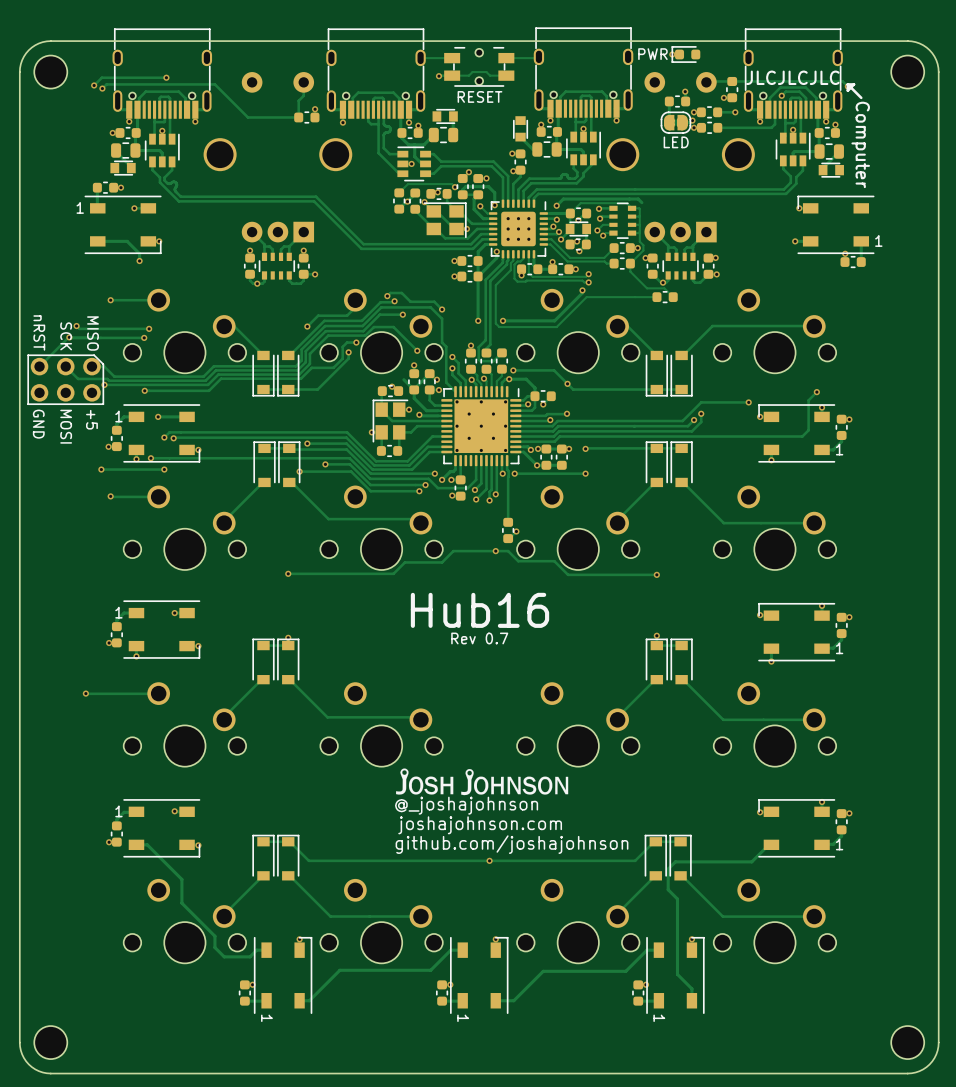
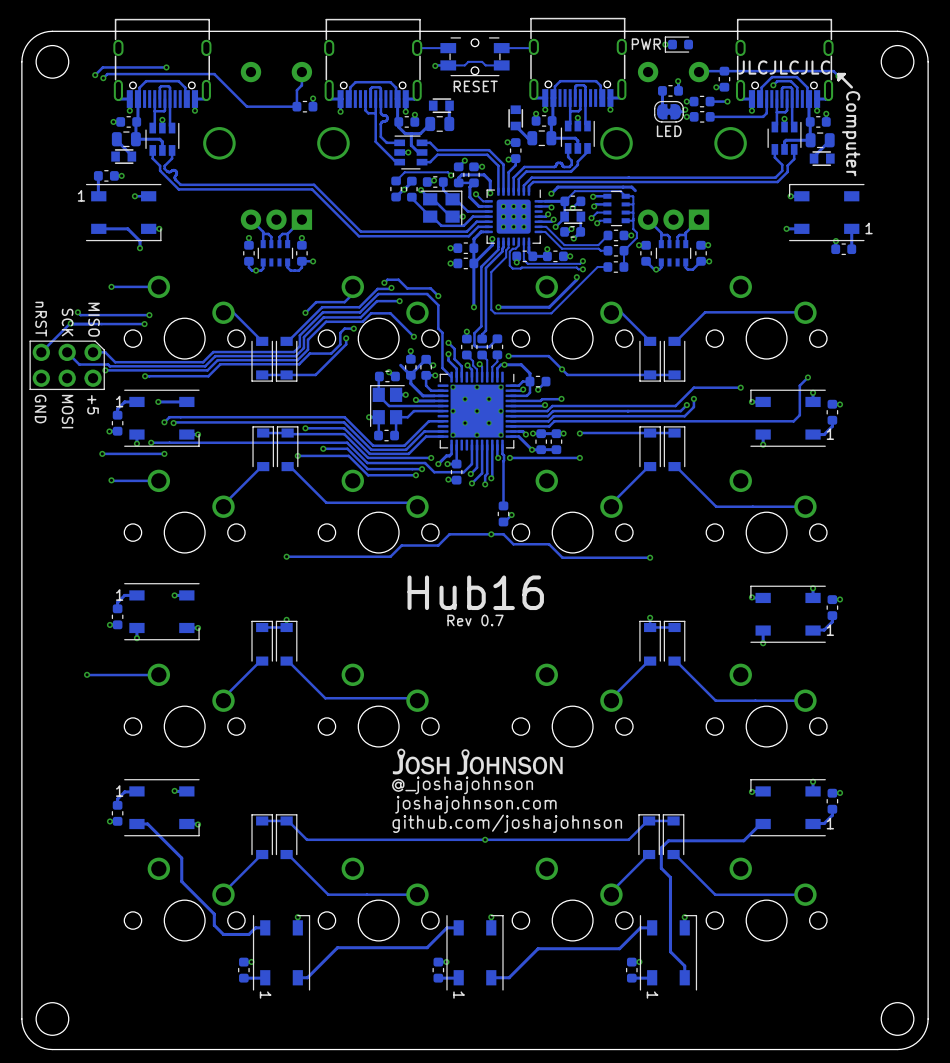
track: (630, 271) (647, 288) (664, 288) (673, 297) -> (624, 258) (624, 266)
track: (656, 297) (586, 297) -> (607, 267) (597, 267) (580, 283)
part position: (665, 297) -> (615, 267)

